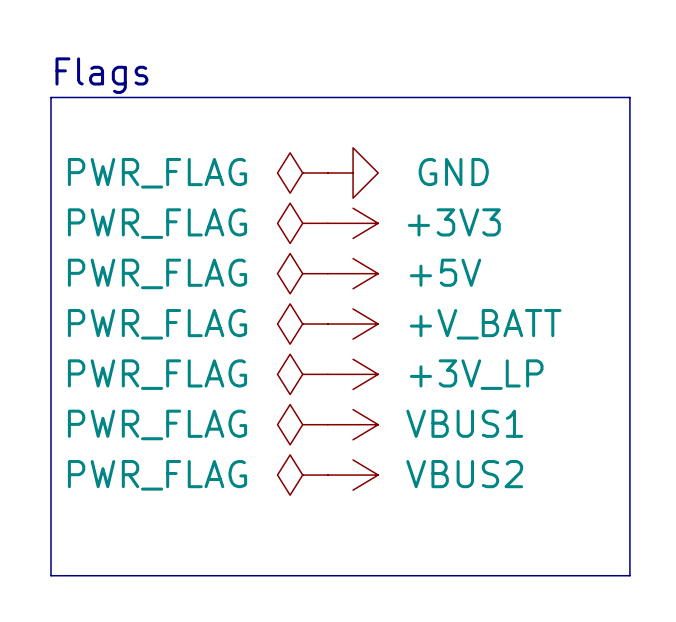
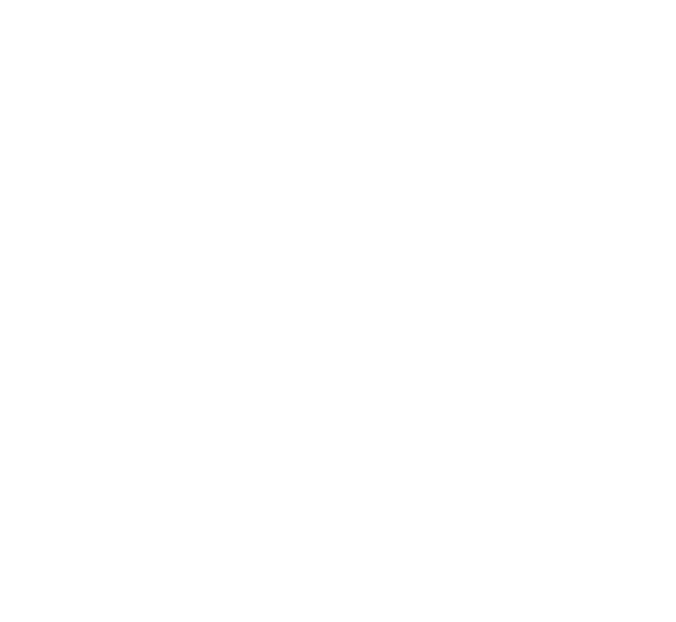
text: Flags (101, 75) -> none
line: (51, 97) (629, 97) (629, 575) (51, 575) (51, 97) -> none
power symbol: PWR_FLAG (302, 172) -> none
power symbol: GND (353, 172) -> none
power symbol: PWR_FLAG (302, 223) -> none
power symbol: +3V3 (353, 223) -> none
power symbol: PWR_FLAG (302, 273) -> none
power symbol: +5V (353, 273) -> none
power symbol: PWR_FLAG (302, 324) -> none
power symbol: +V_BATT (353, 324) -> none
power symbol: PWR_FLAG (302, 374) -> none
power symbol: +3V_LP (353, 374) -> none
power symbol: PWR_FLAG (302, 424) -> none
power symbol: VBUS1 (353, 424) -> none
power symbol: PWR_FLAG (302, 475) -> none
power symbol: VBUS2 (353, 475) -> none

